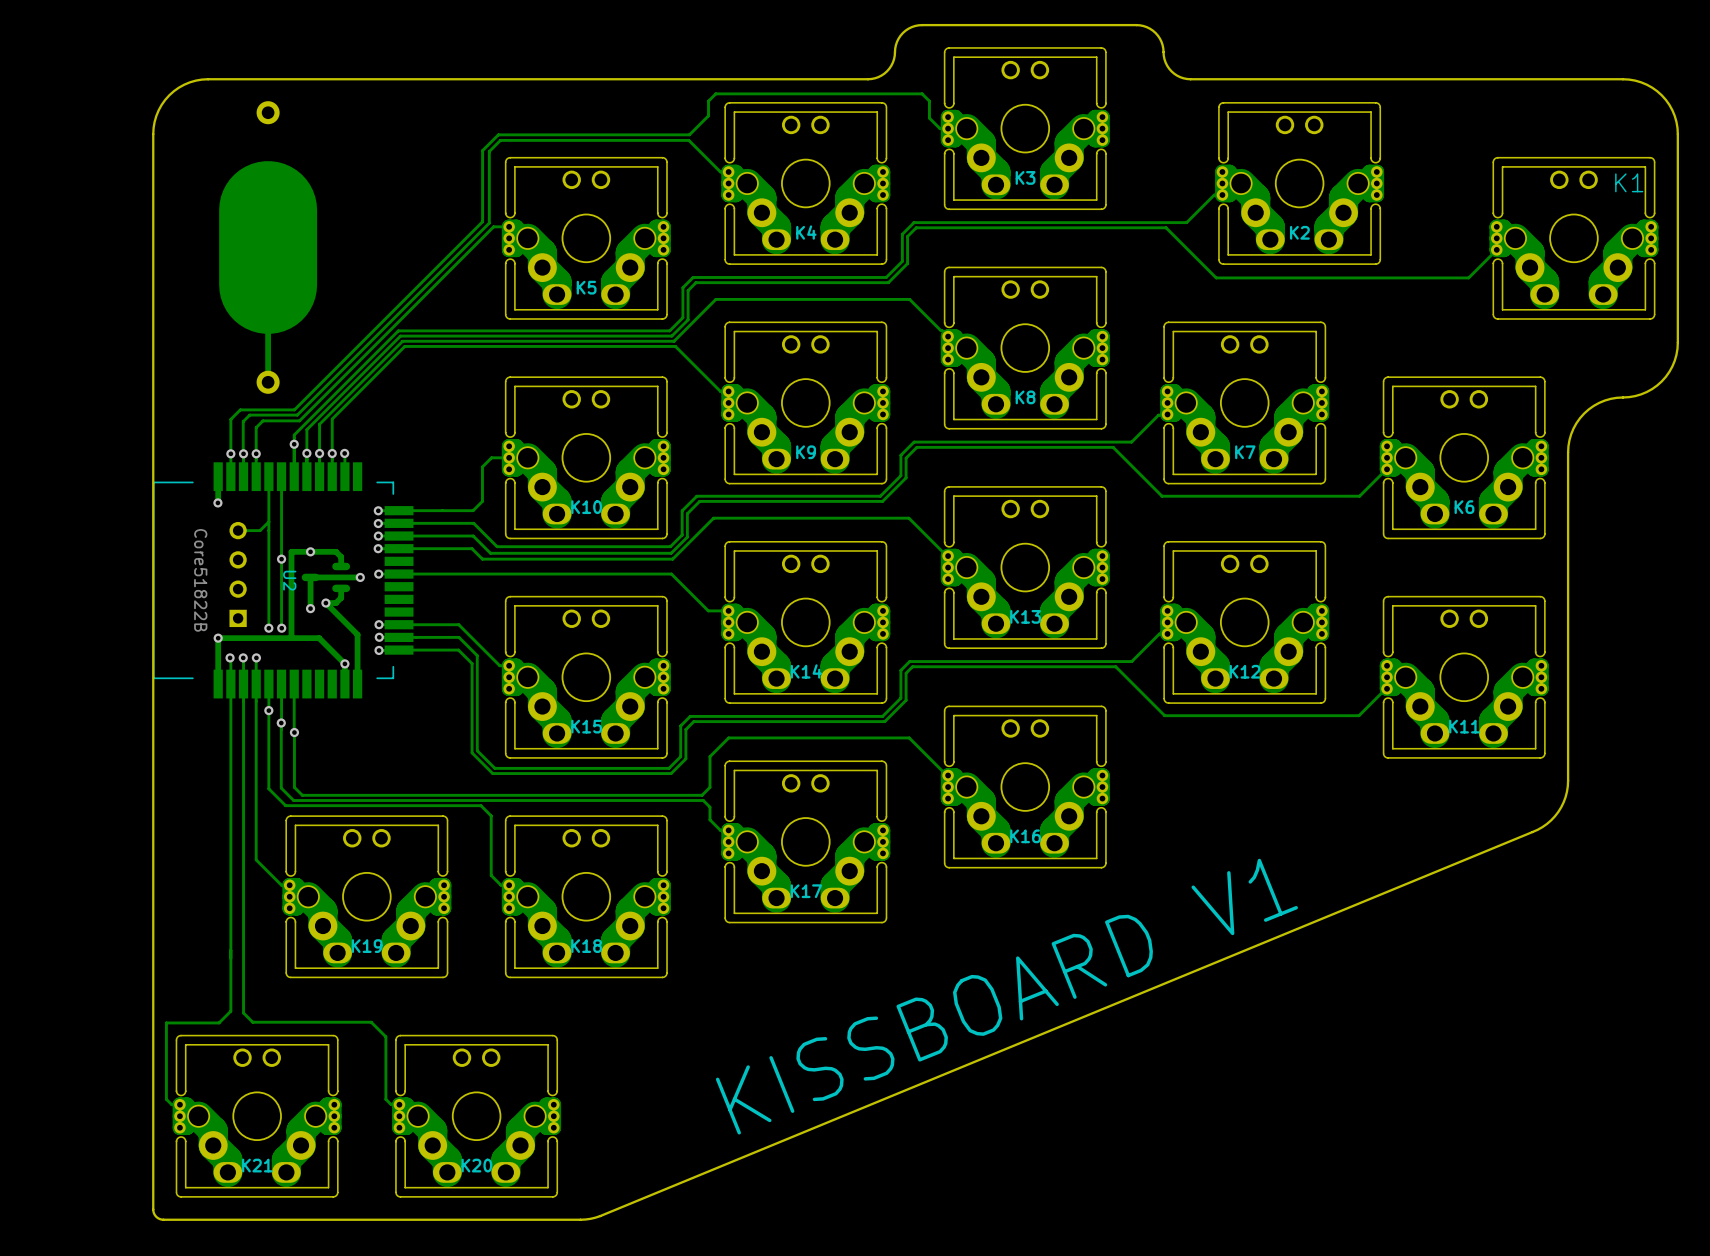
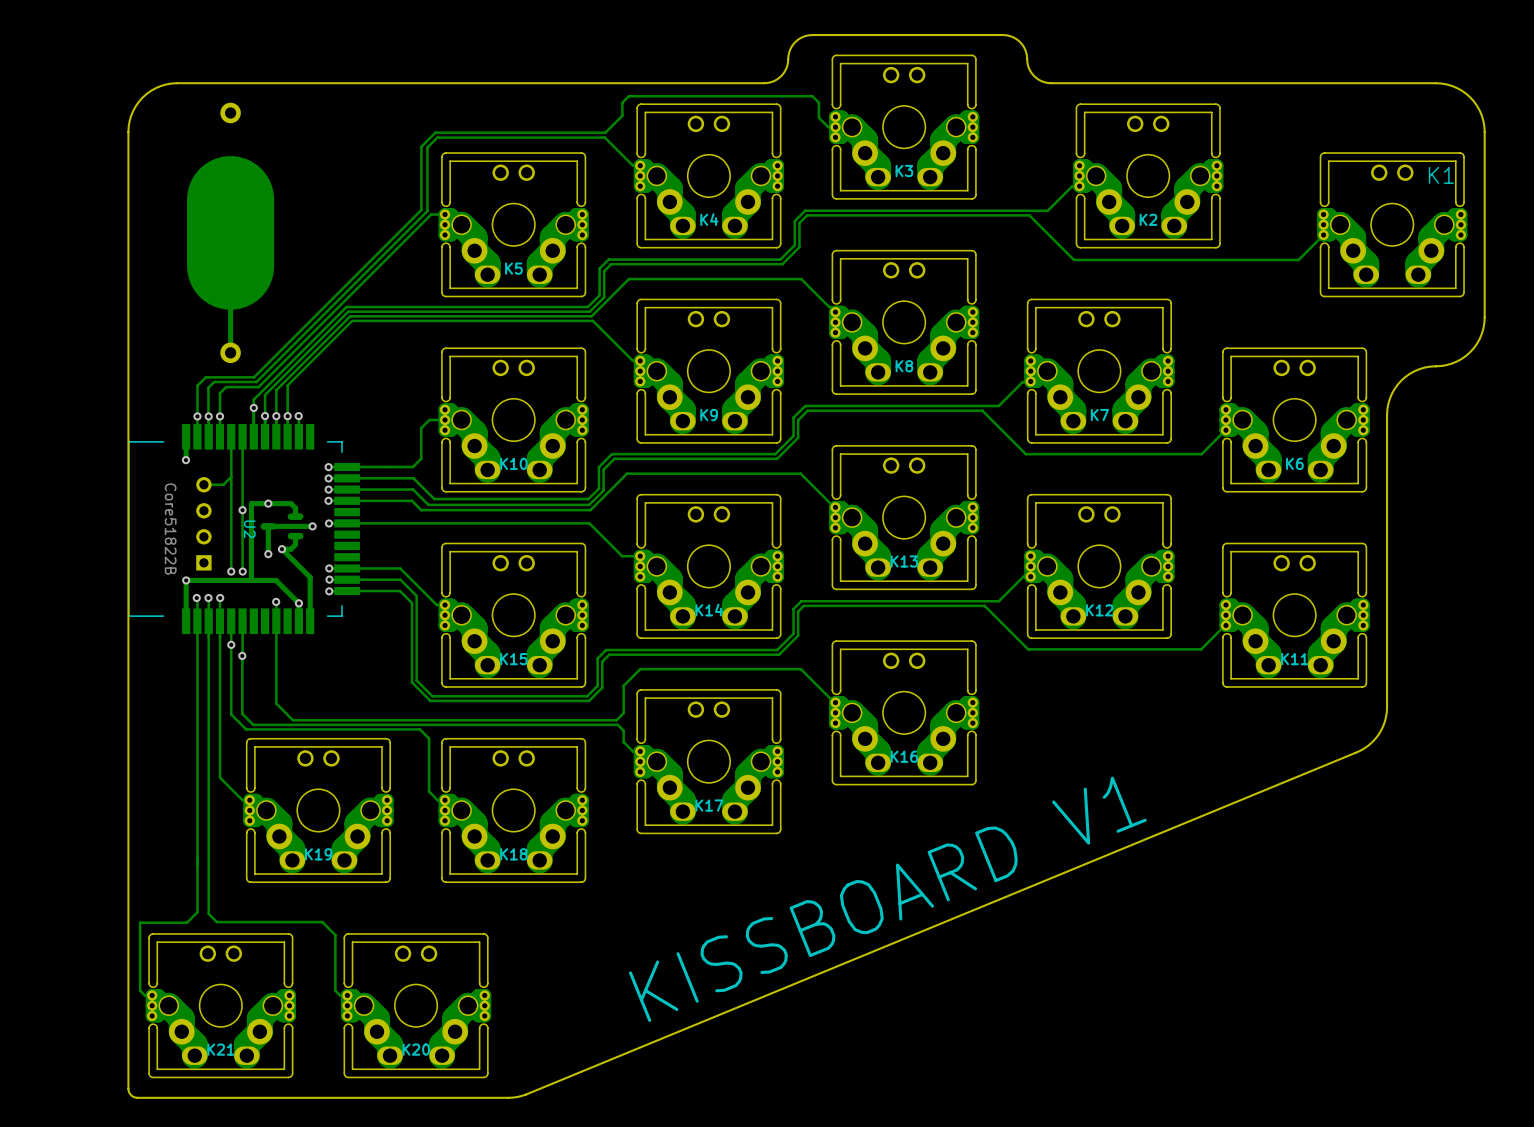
via: none -> (276, 601)
track: (294, 684) (294, 787) (302, 795) (338, 795) -> (276, 601) (276, 703) (292, 720)
via: (294, 732) -> none

